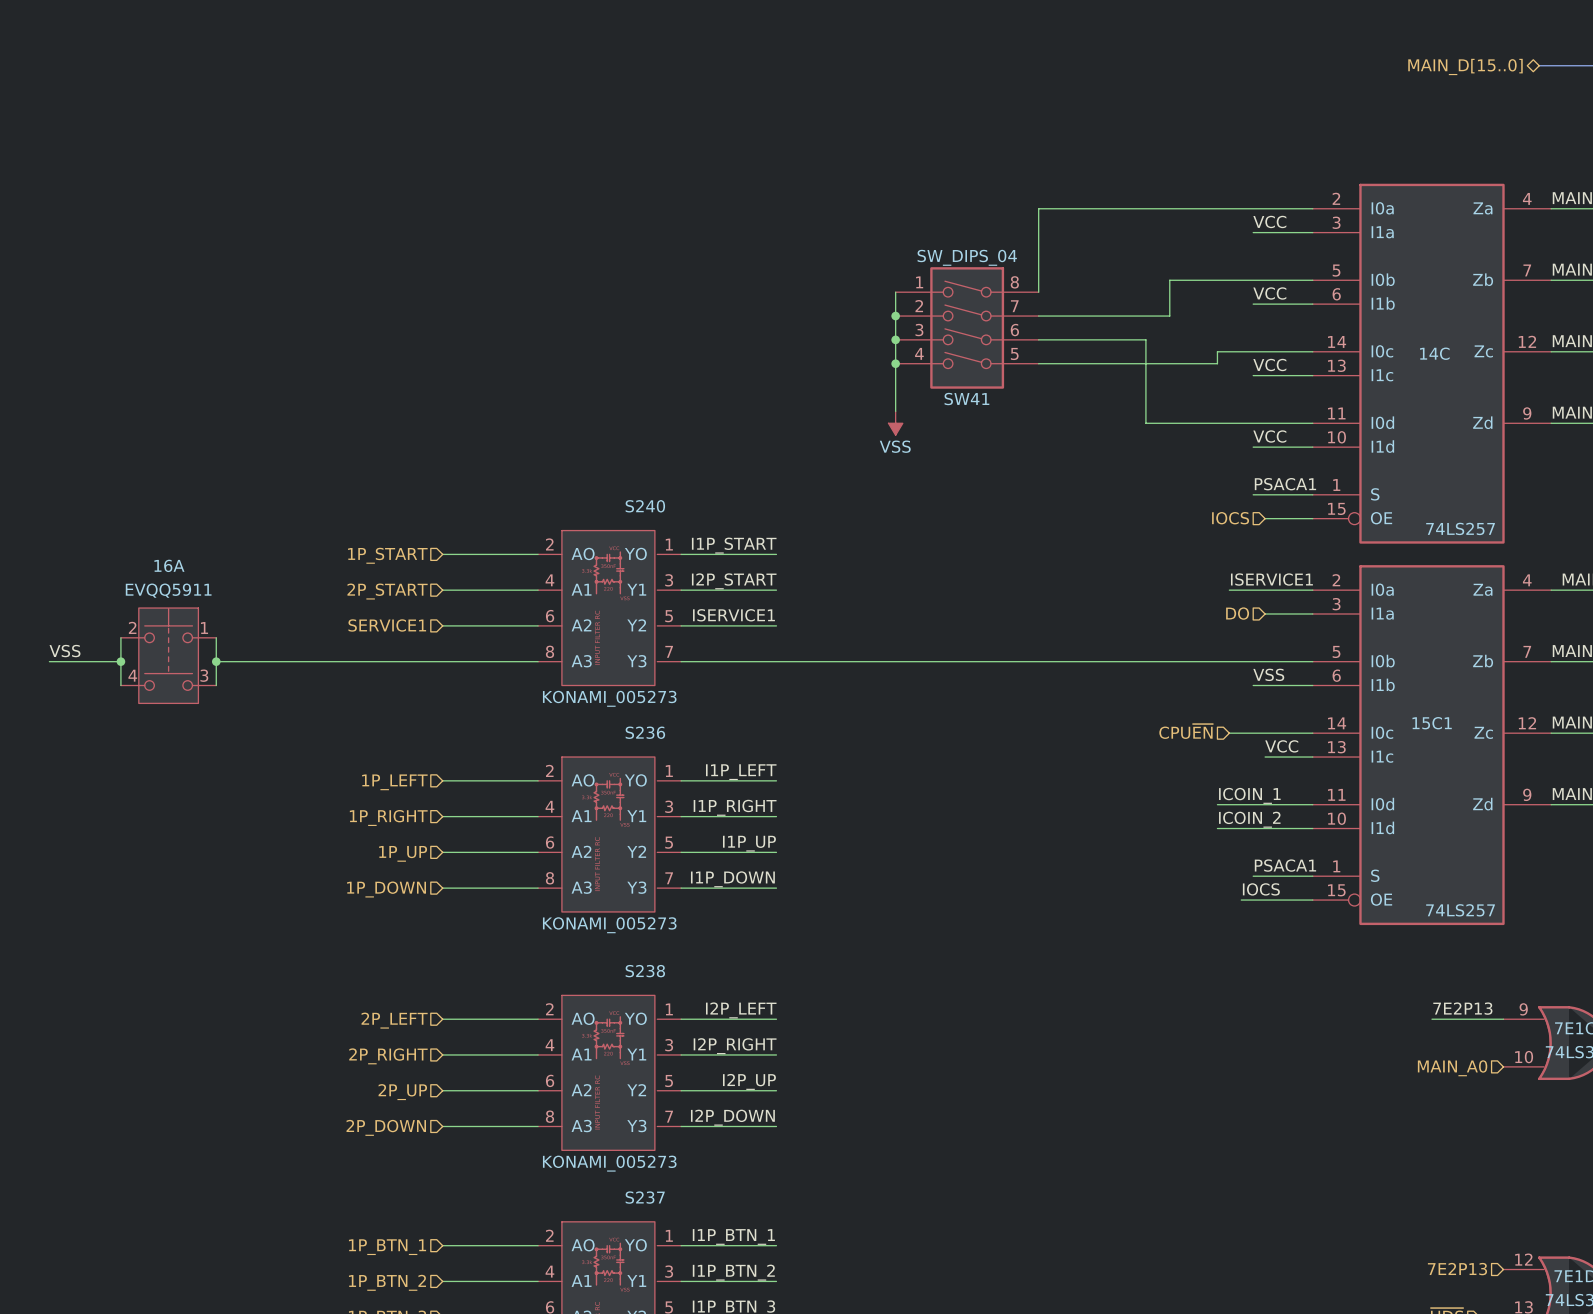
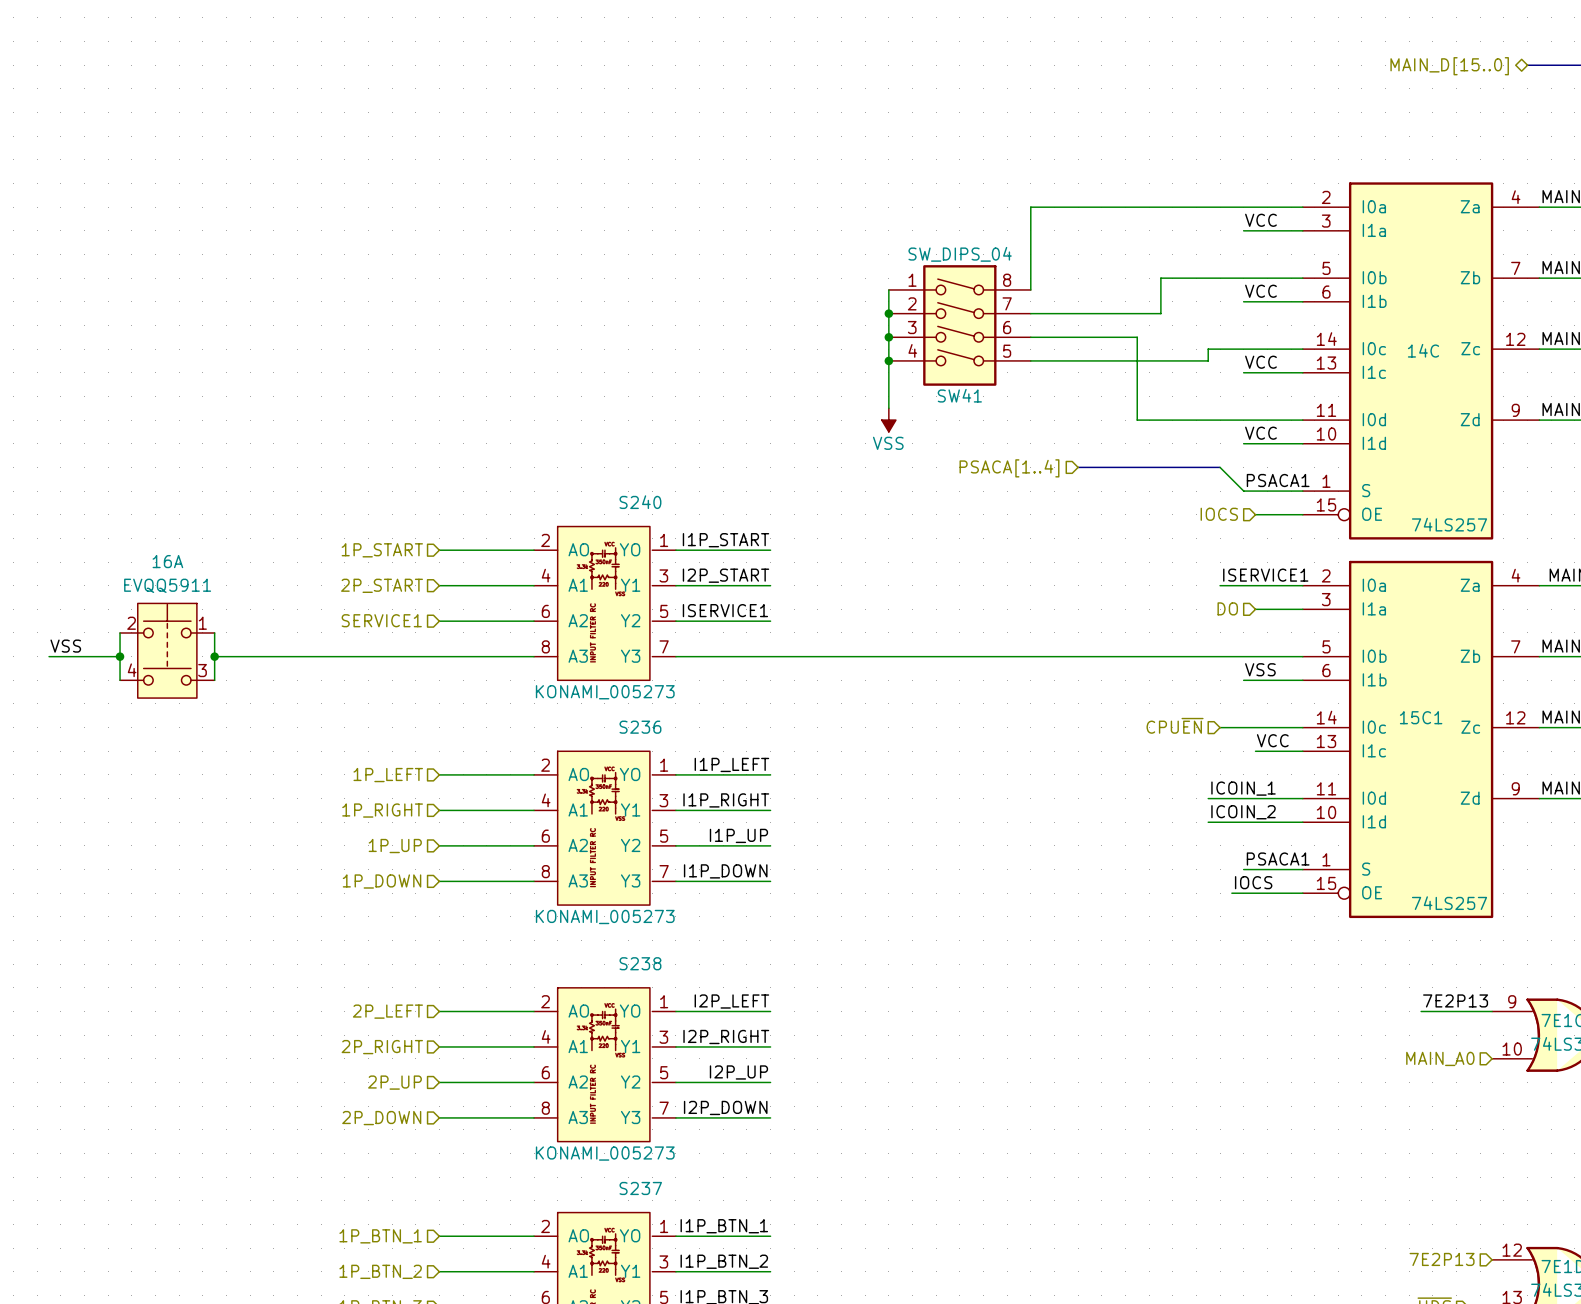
bus: none -> (1078, 467) (1220, 467)
wire: none -> (1220, 467) (1243, 491)
hierarchical label: none -> PSACA[1..4] (1009, 468)

